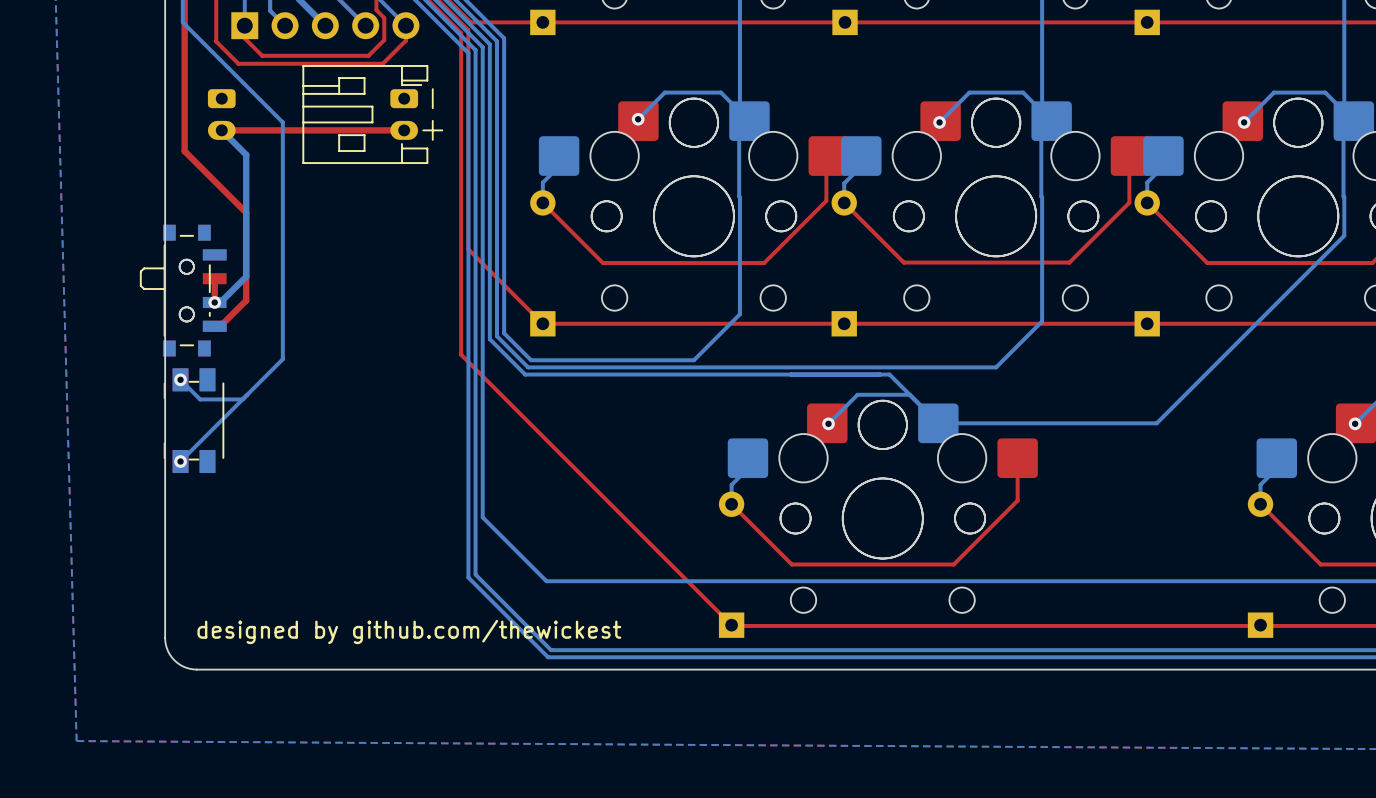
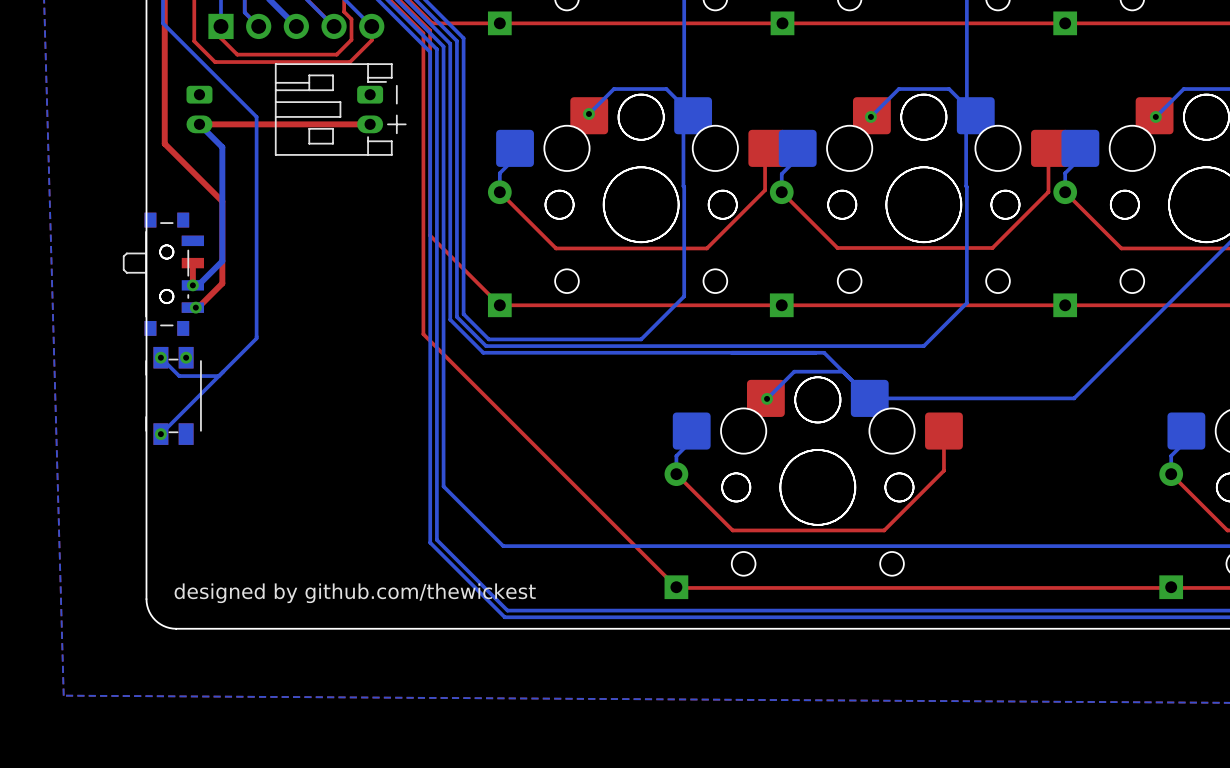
via: none -> (195, 307)
via: none -> (186, 357)

